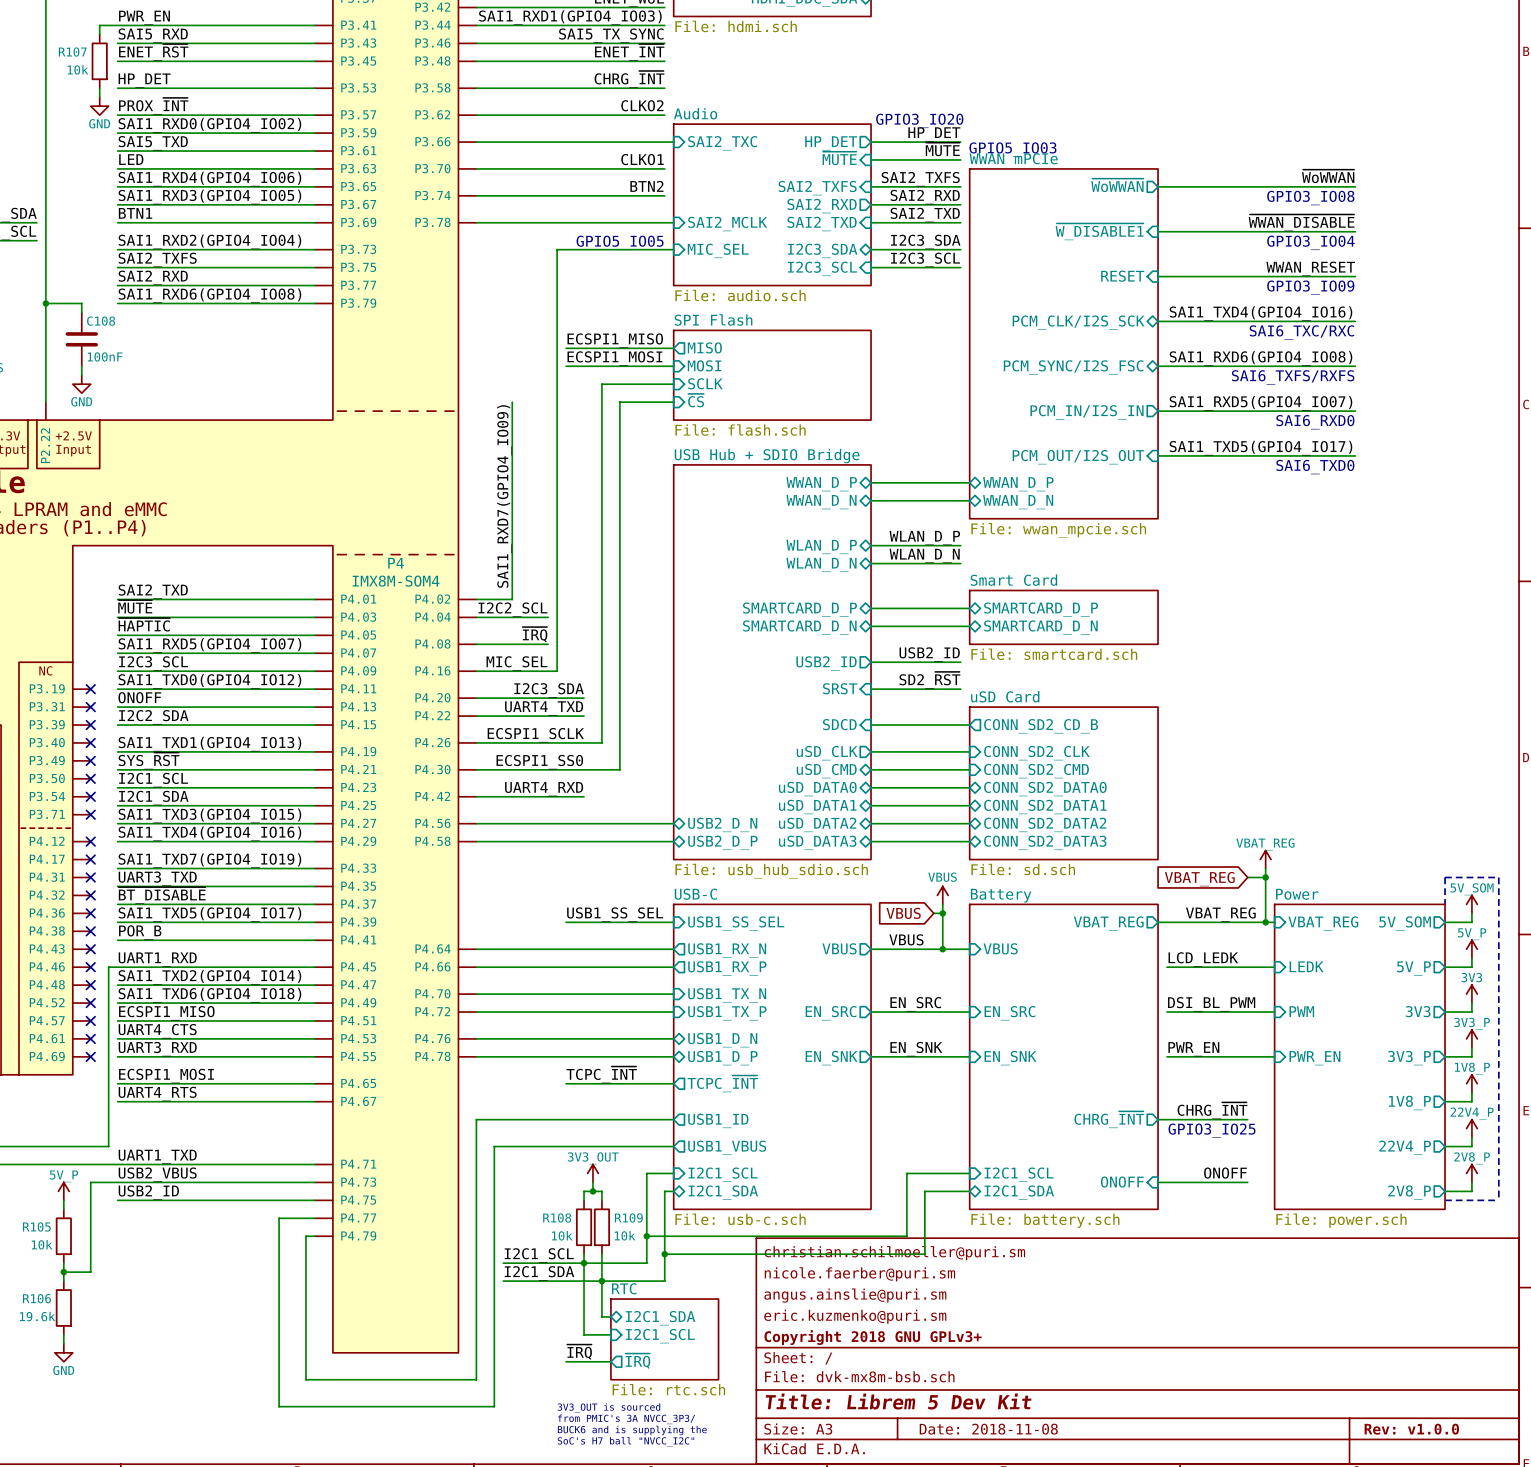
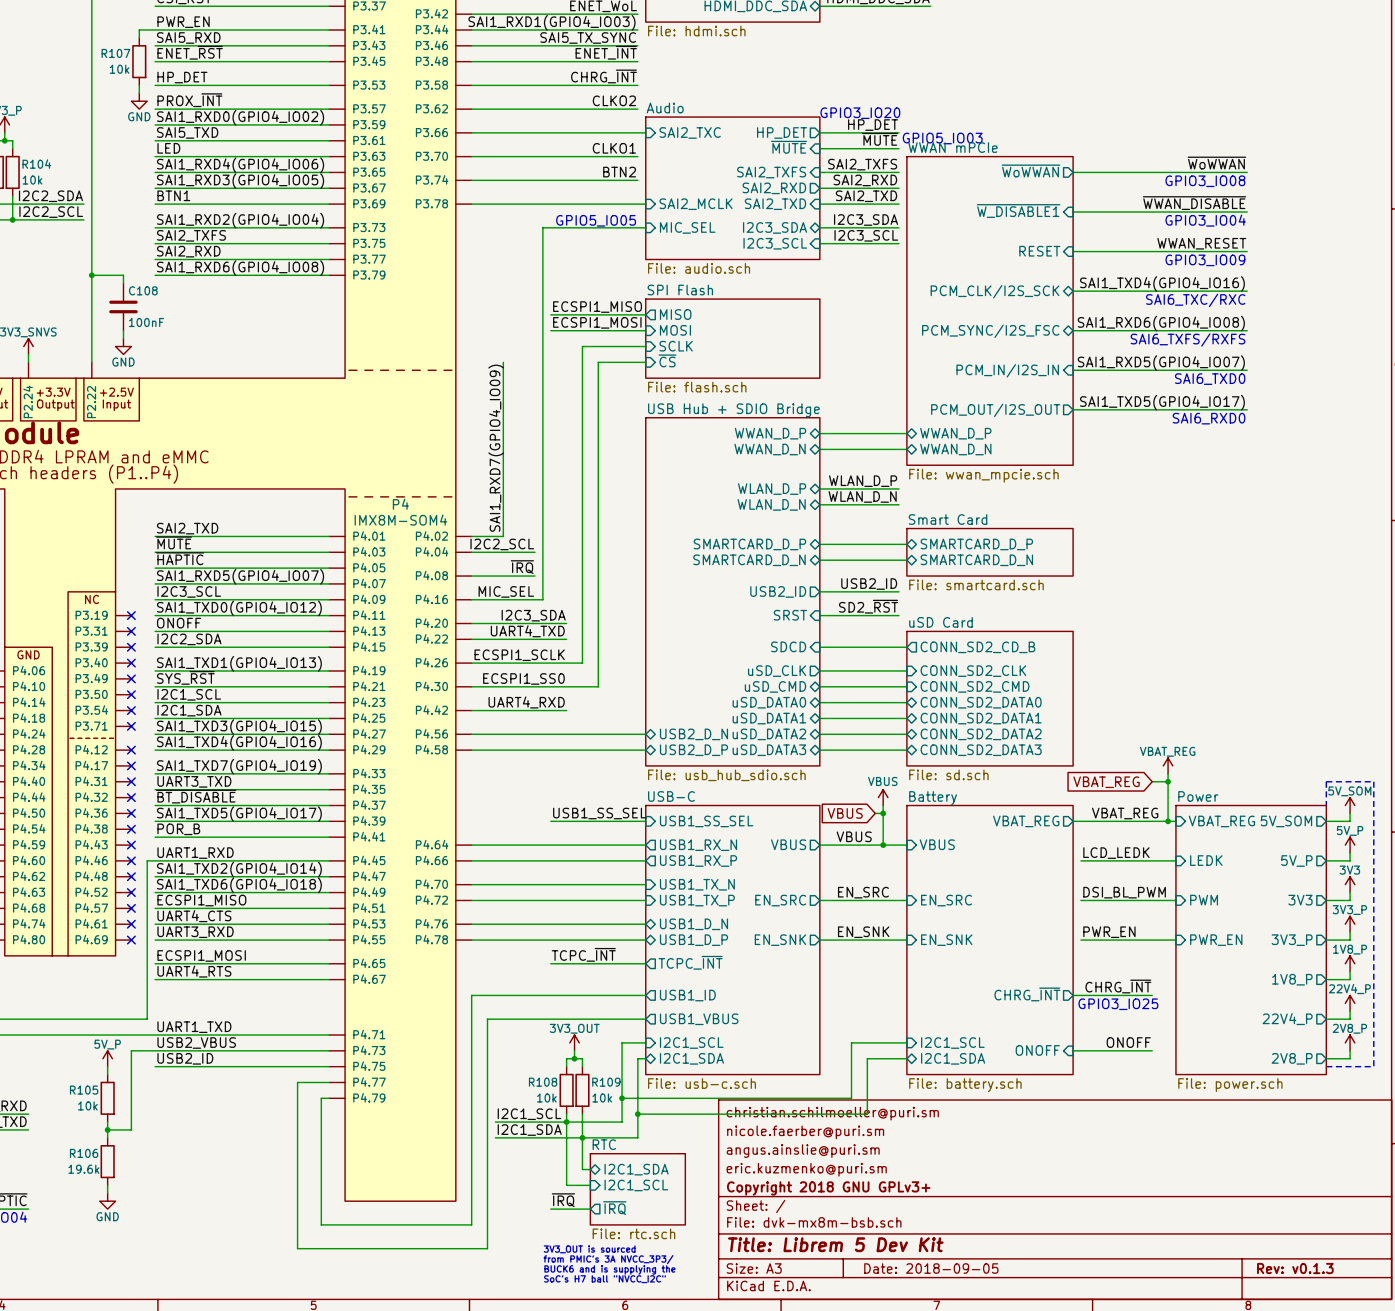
sheet pin shape: output (1087, 412) -> input (1007, 370)
text: SAI6_RXD0 (1315, 422) -> SAI6_TXD0 (1210, 379)
sheet pin shape: input (1078, 457) -> output (995, 410)
text: SAI6_TXD0 (1315, 467) -> SAI6_RXD0 (1209, 418)
title block: Date: 2018-11-08 (988, 1429) -> Date: 2018-09-05 (931, 1268)
title block: Rev: v1.0.0 (1411, 1429) -> Rev: v0.1.3 (1295, 1268)

